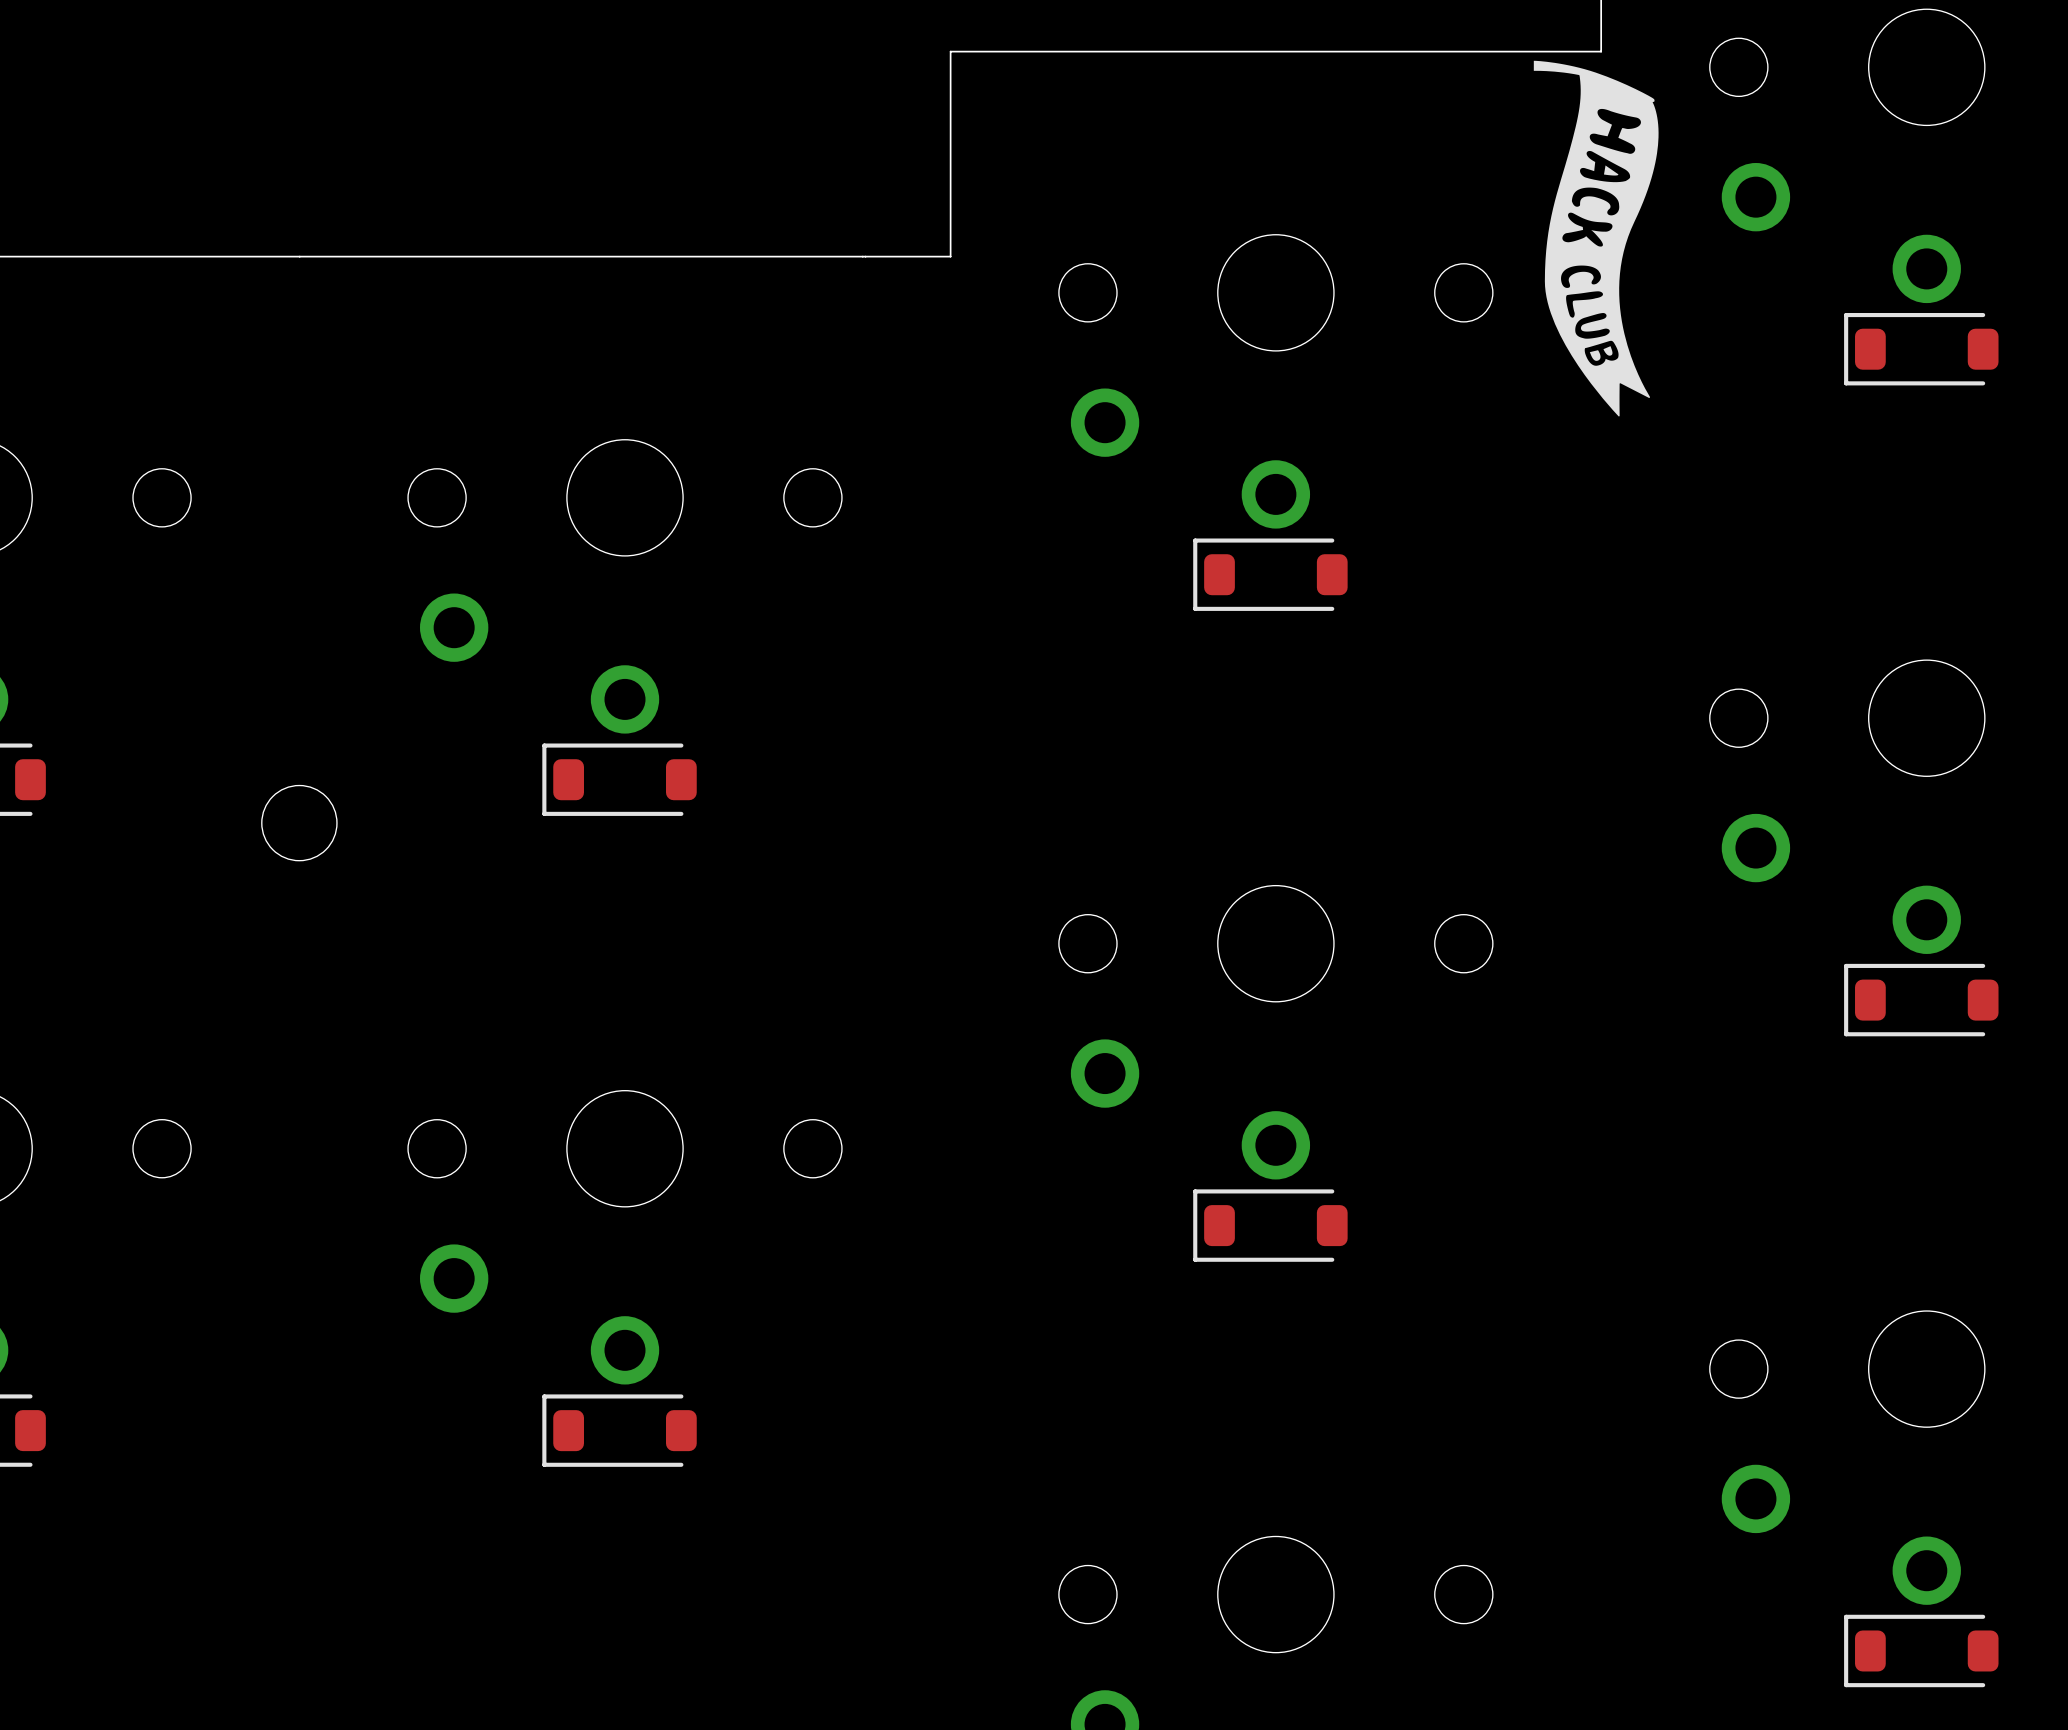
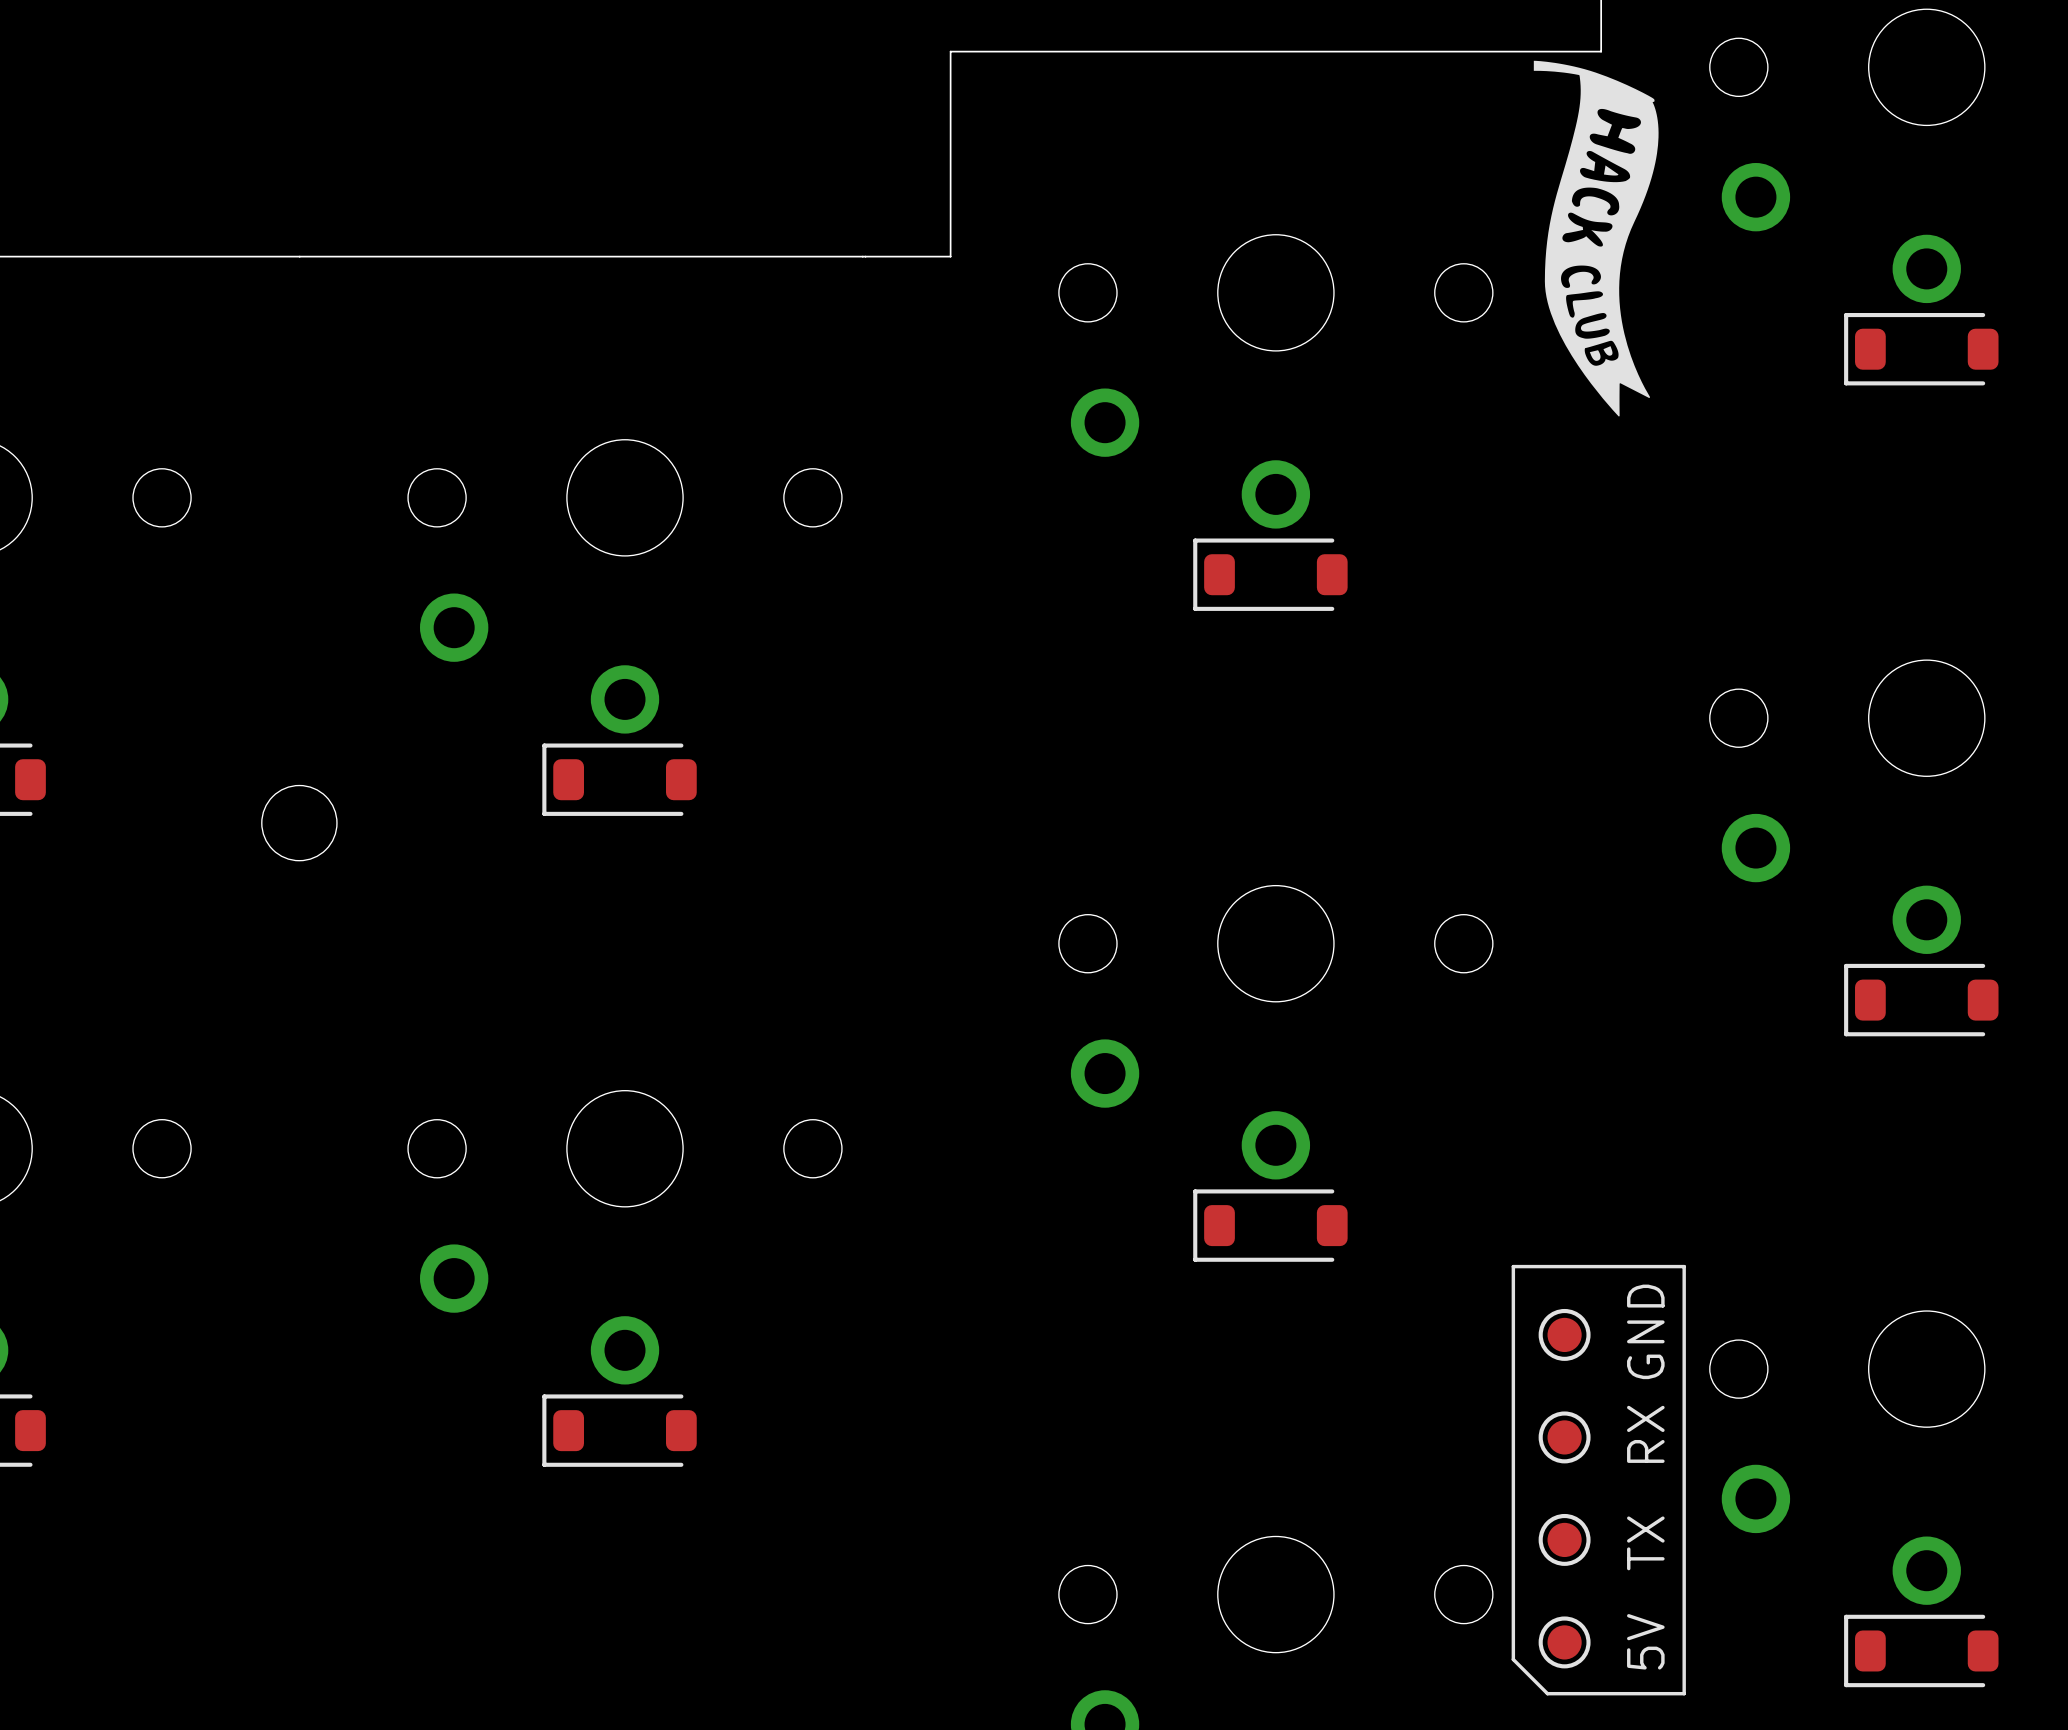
line: none -> (1513, 1266) (1684, 1266) (1684, 1693) (1547, 1693) (1513, 1659) (1513, 1266)
text: none -> GND (1645, 1331)
part: none -> (1564, 1334)
text: none -> RX (1645, 1434)
part: none -> (1564, 1437)
part: none -> (1564, 1539)
text: none -> TX (1645, 1543)
text: none -> 5V (1645, 1641)
part: none -> (1564, 1642)

